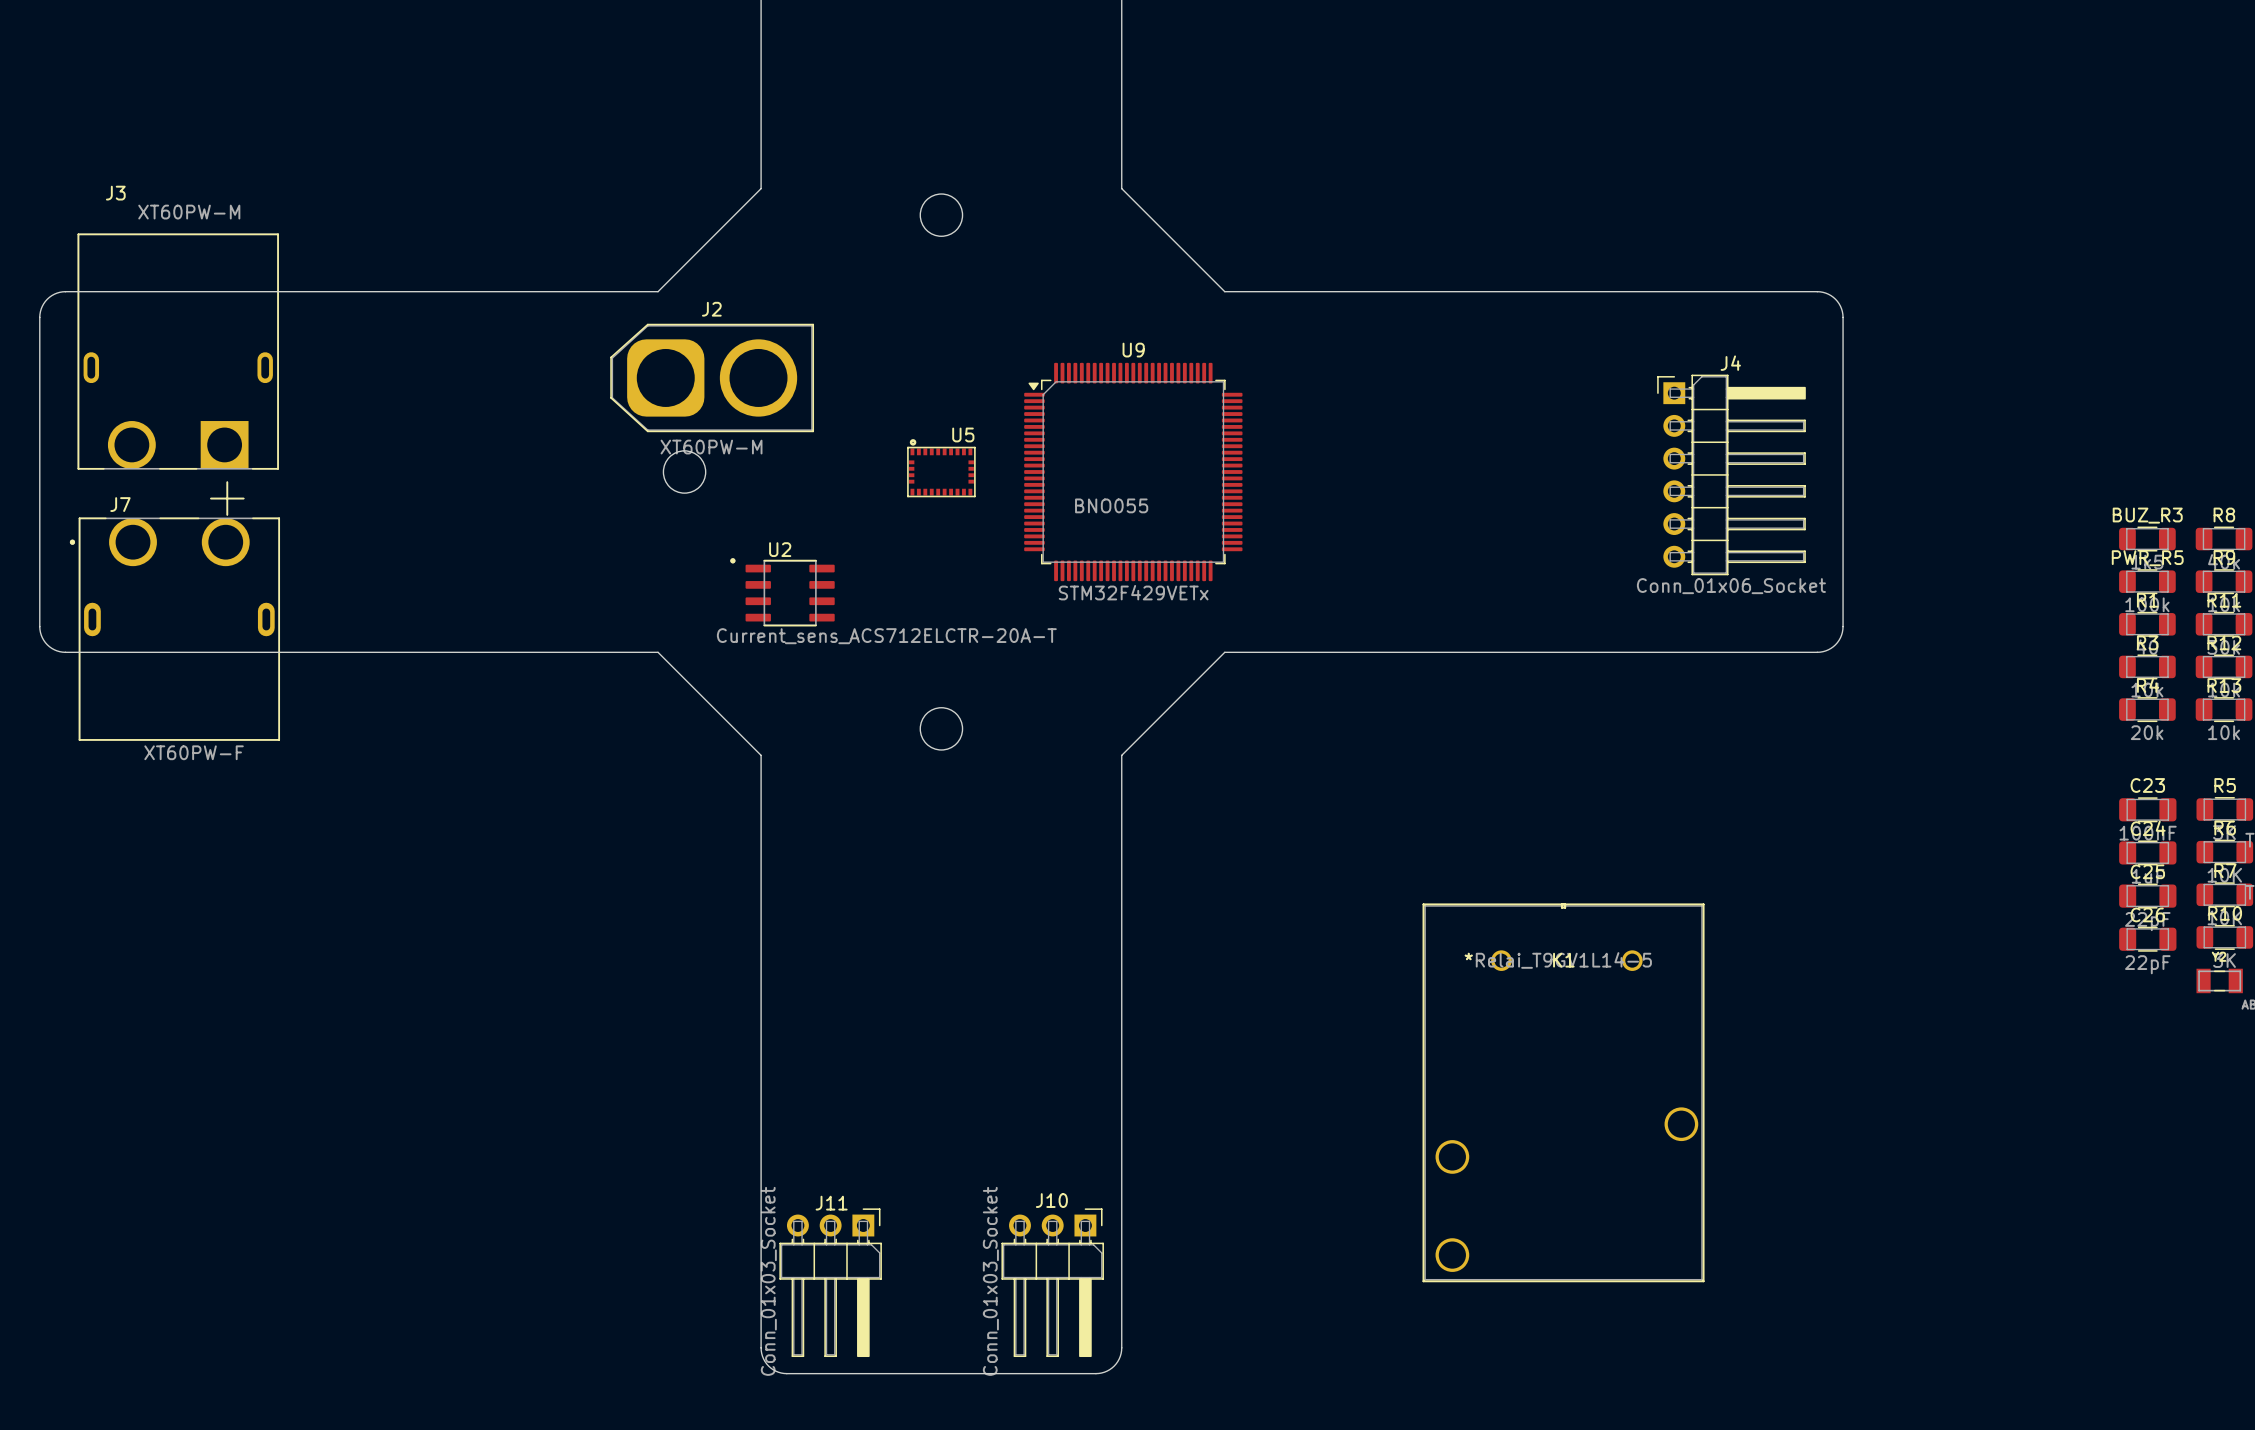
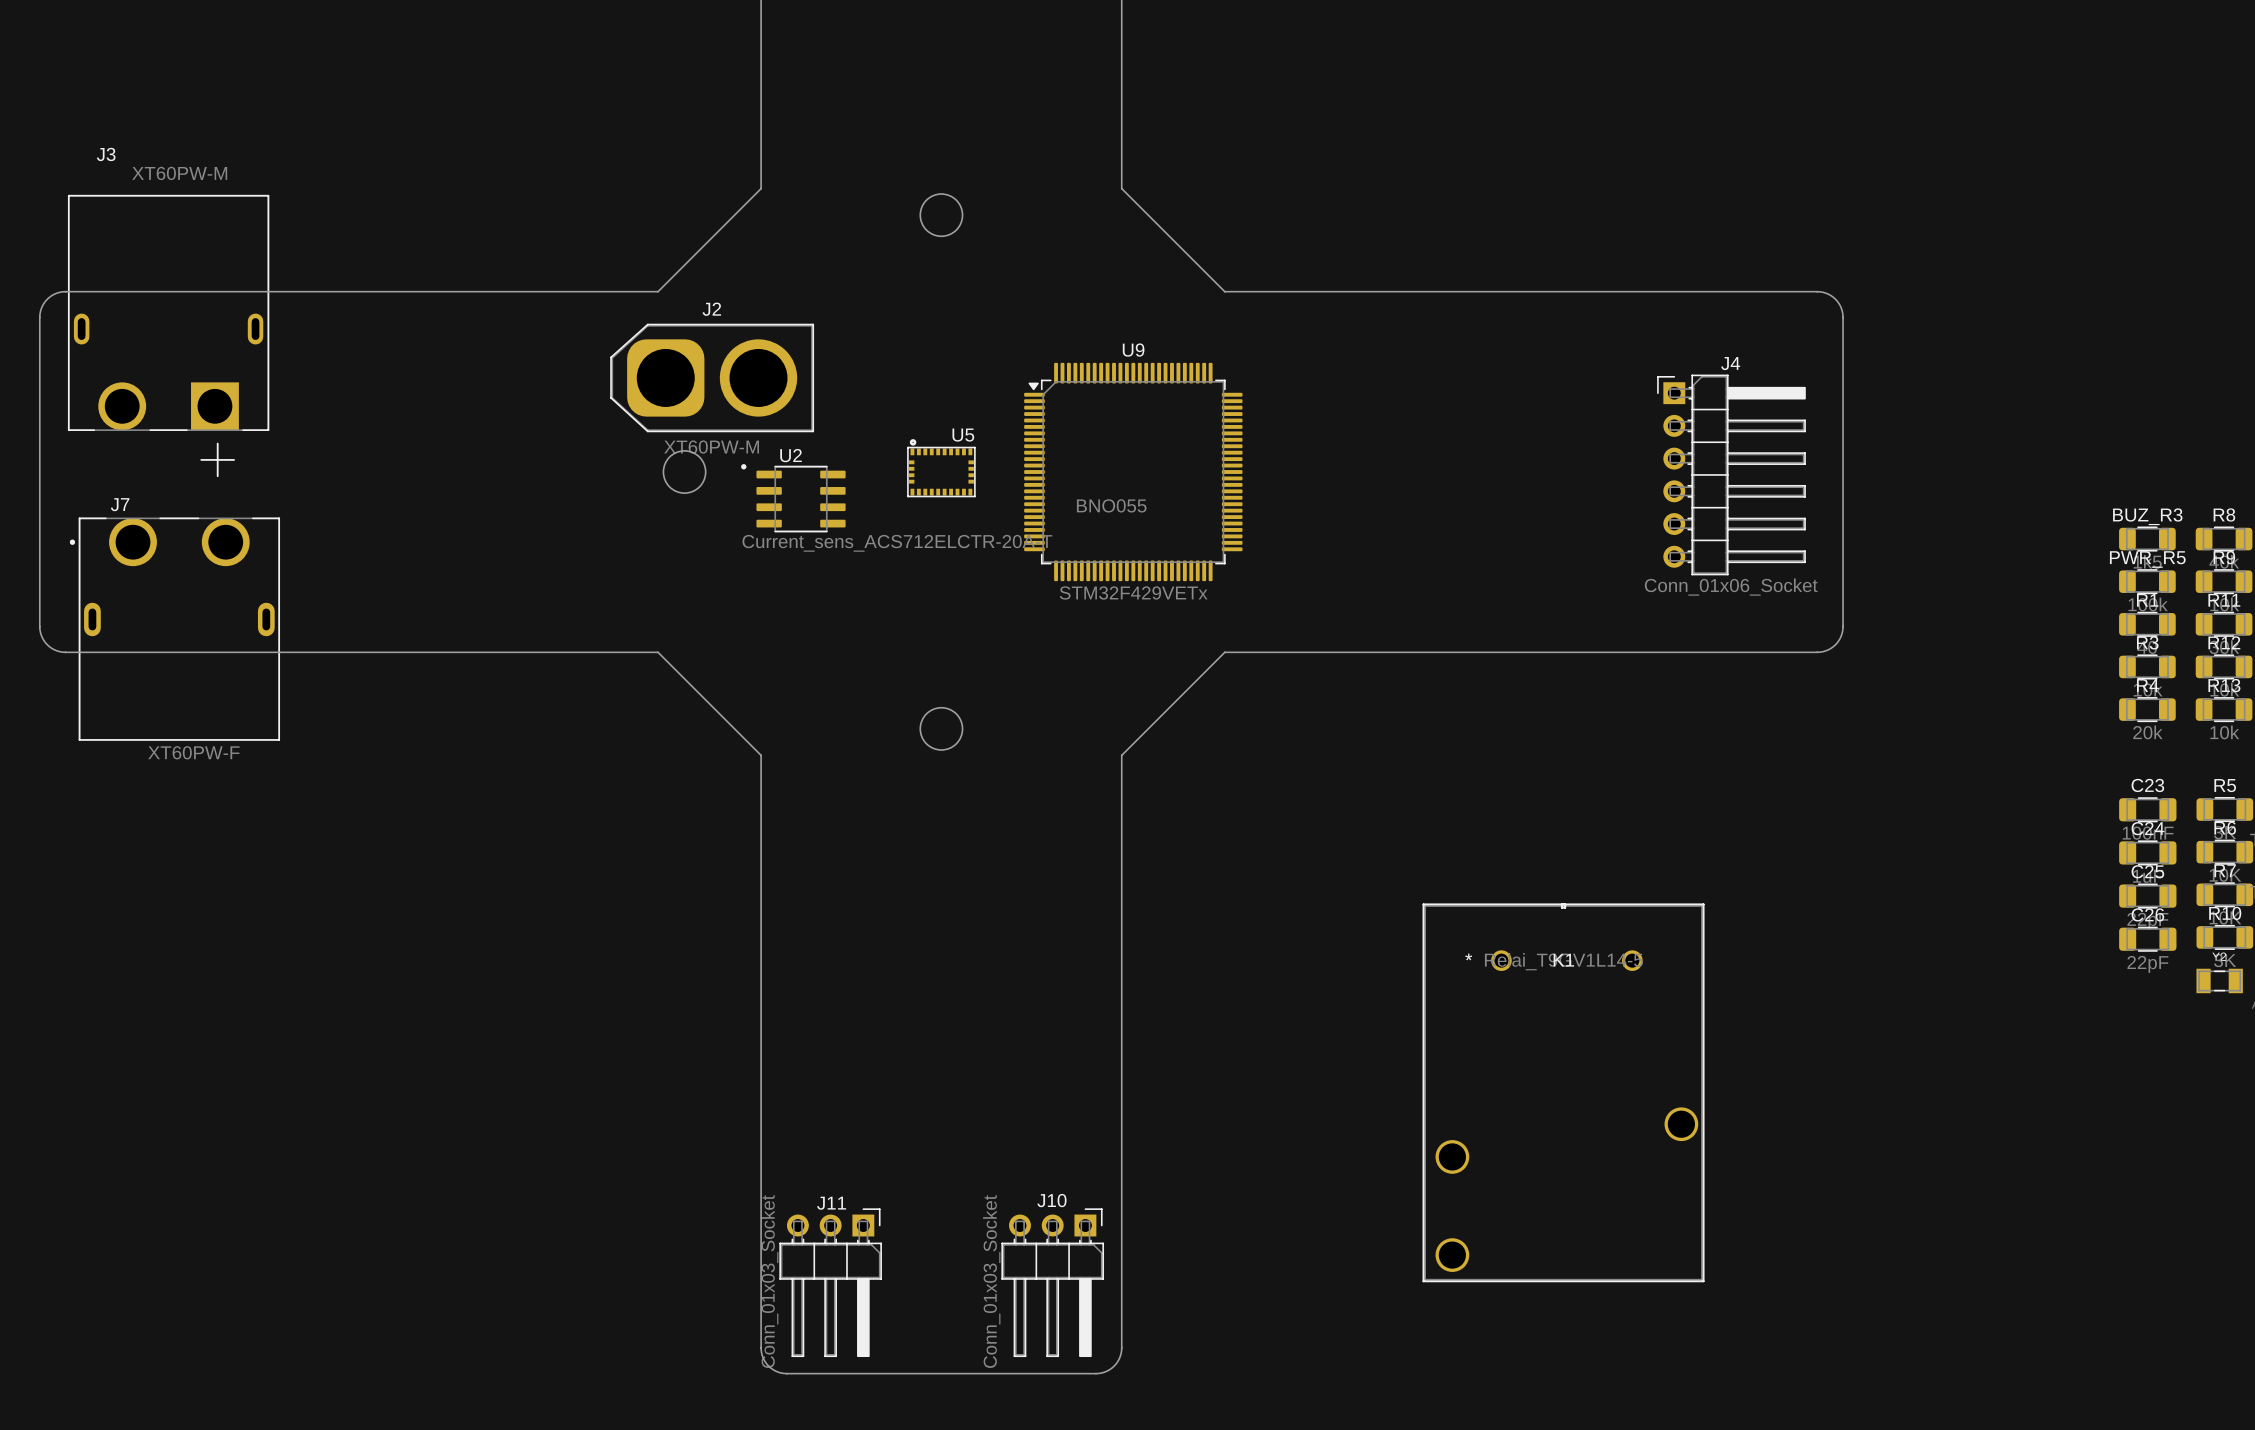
J3 position: (178, 374) -> (168, 335)
U2 position: (782, 592) -> (793, 498)

